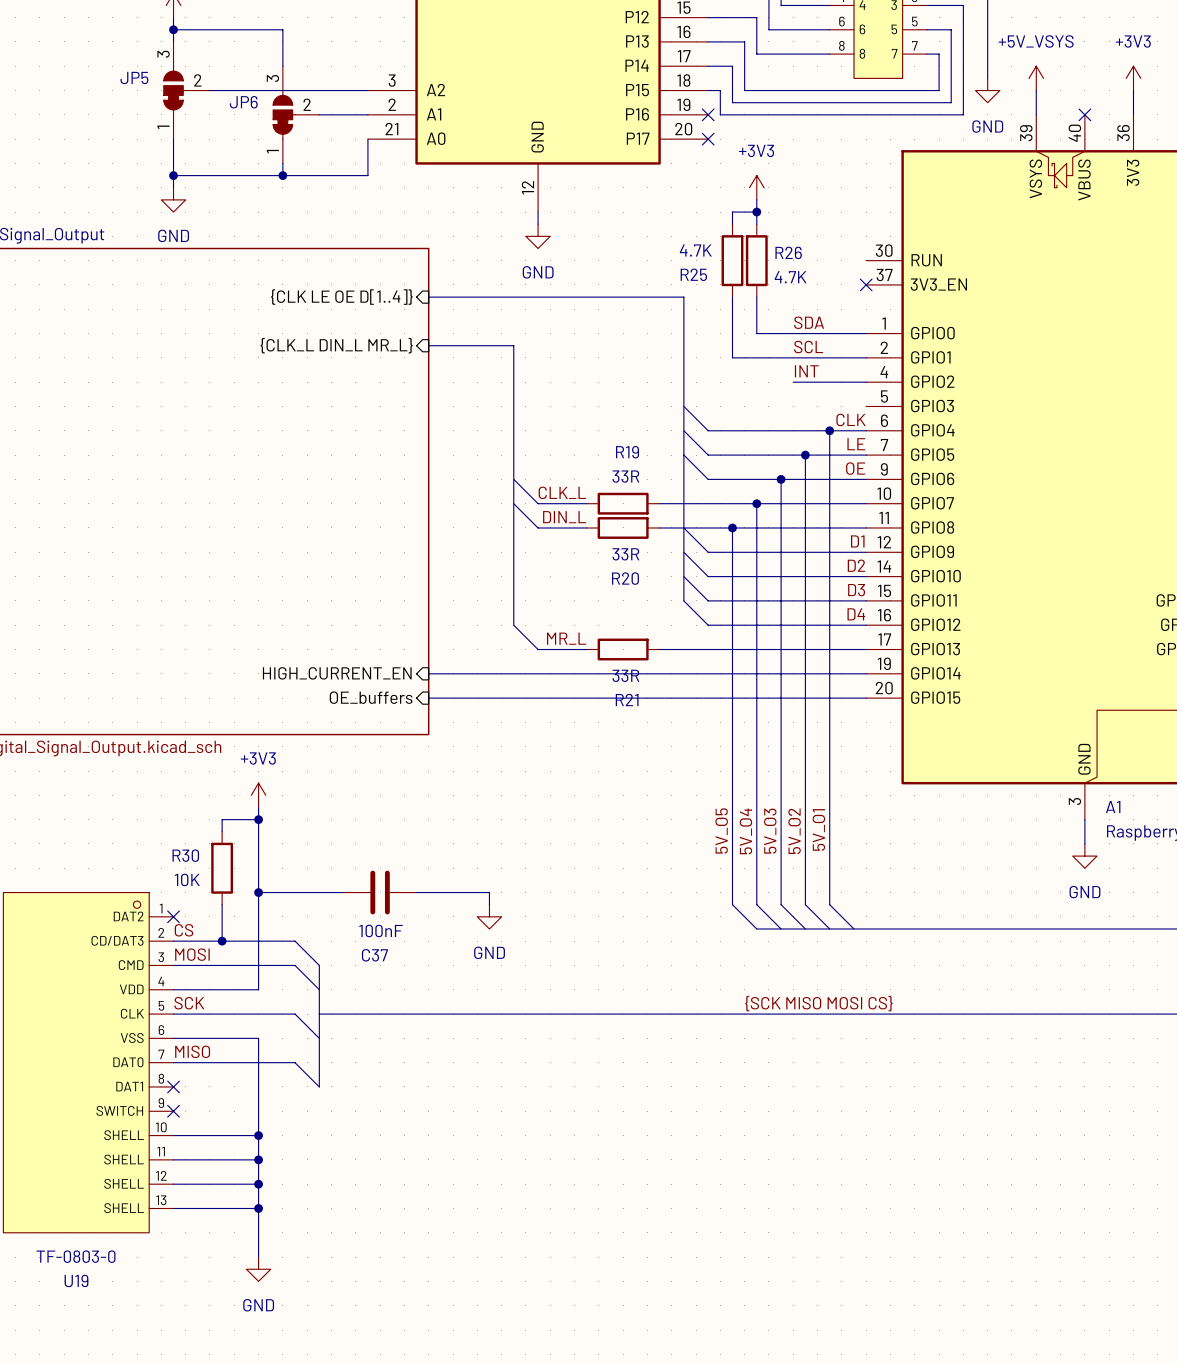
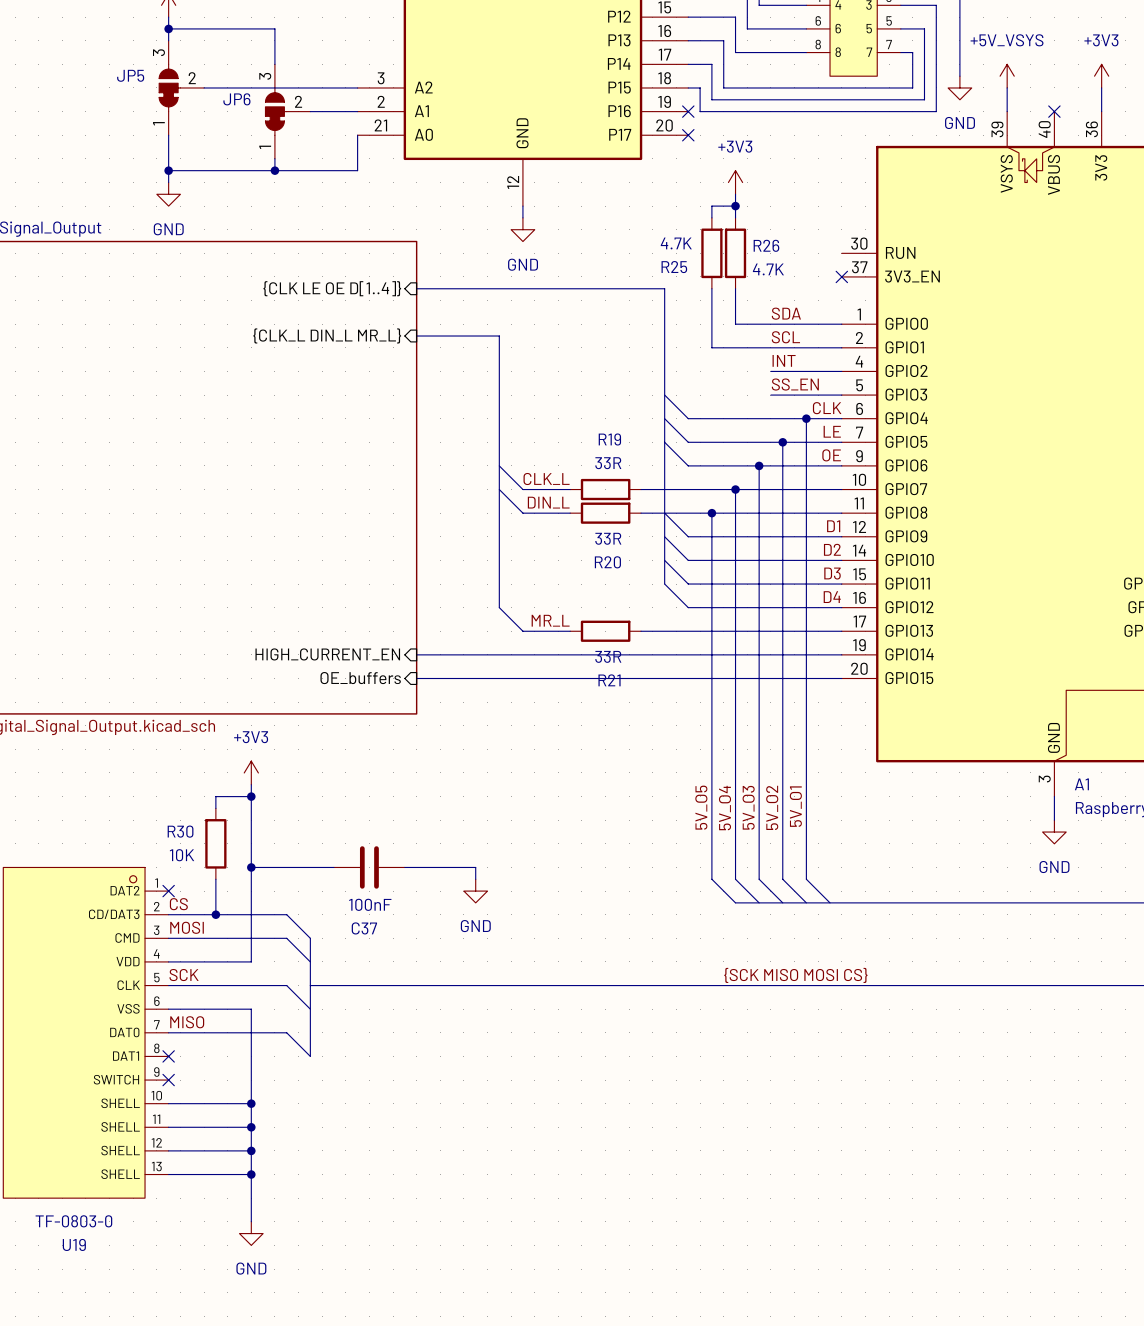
label: none -> SS_EN (795, 384)
wire: none -> (770, 395) (841, 395)

